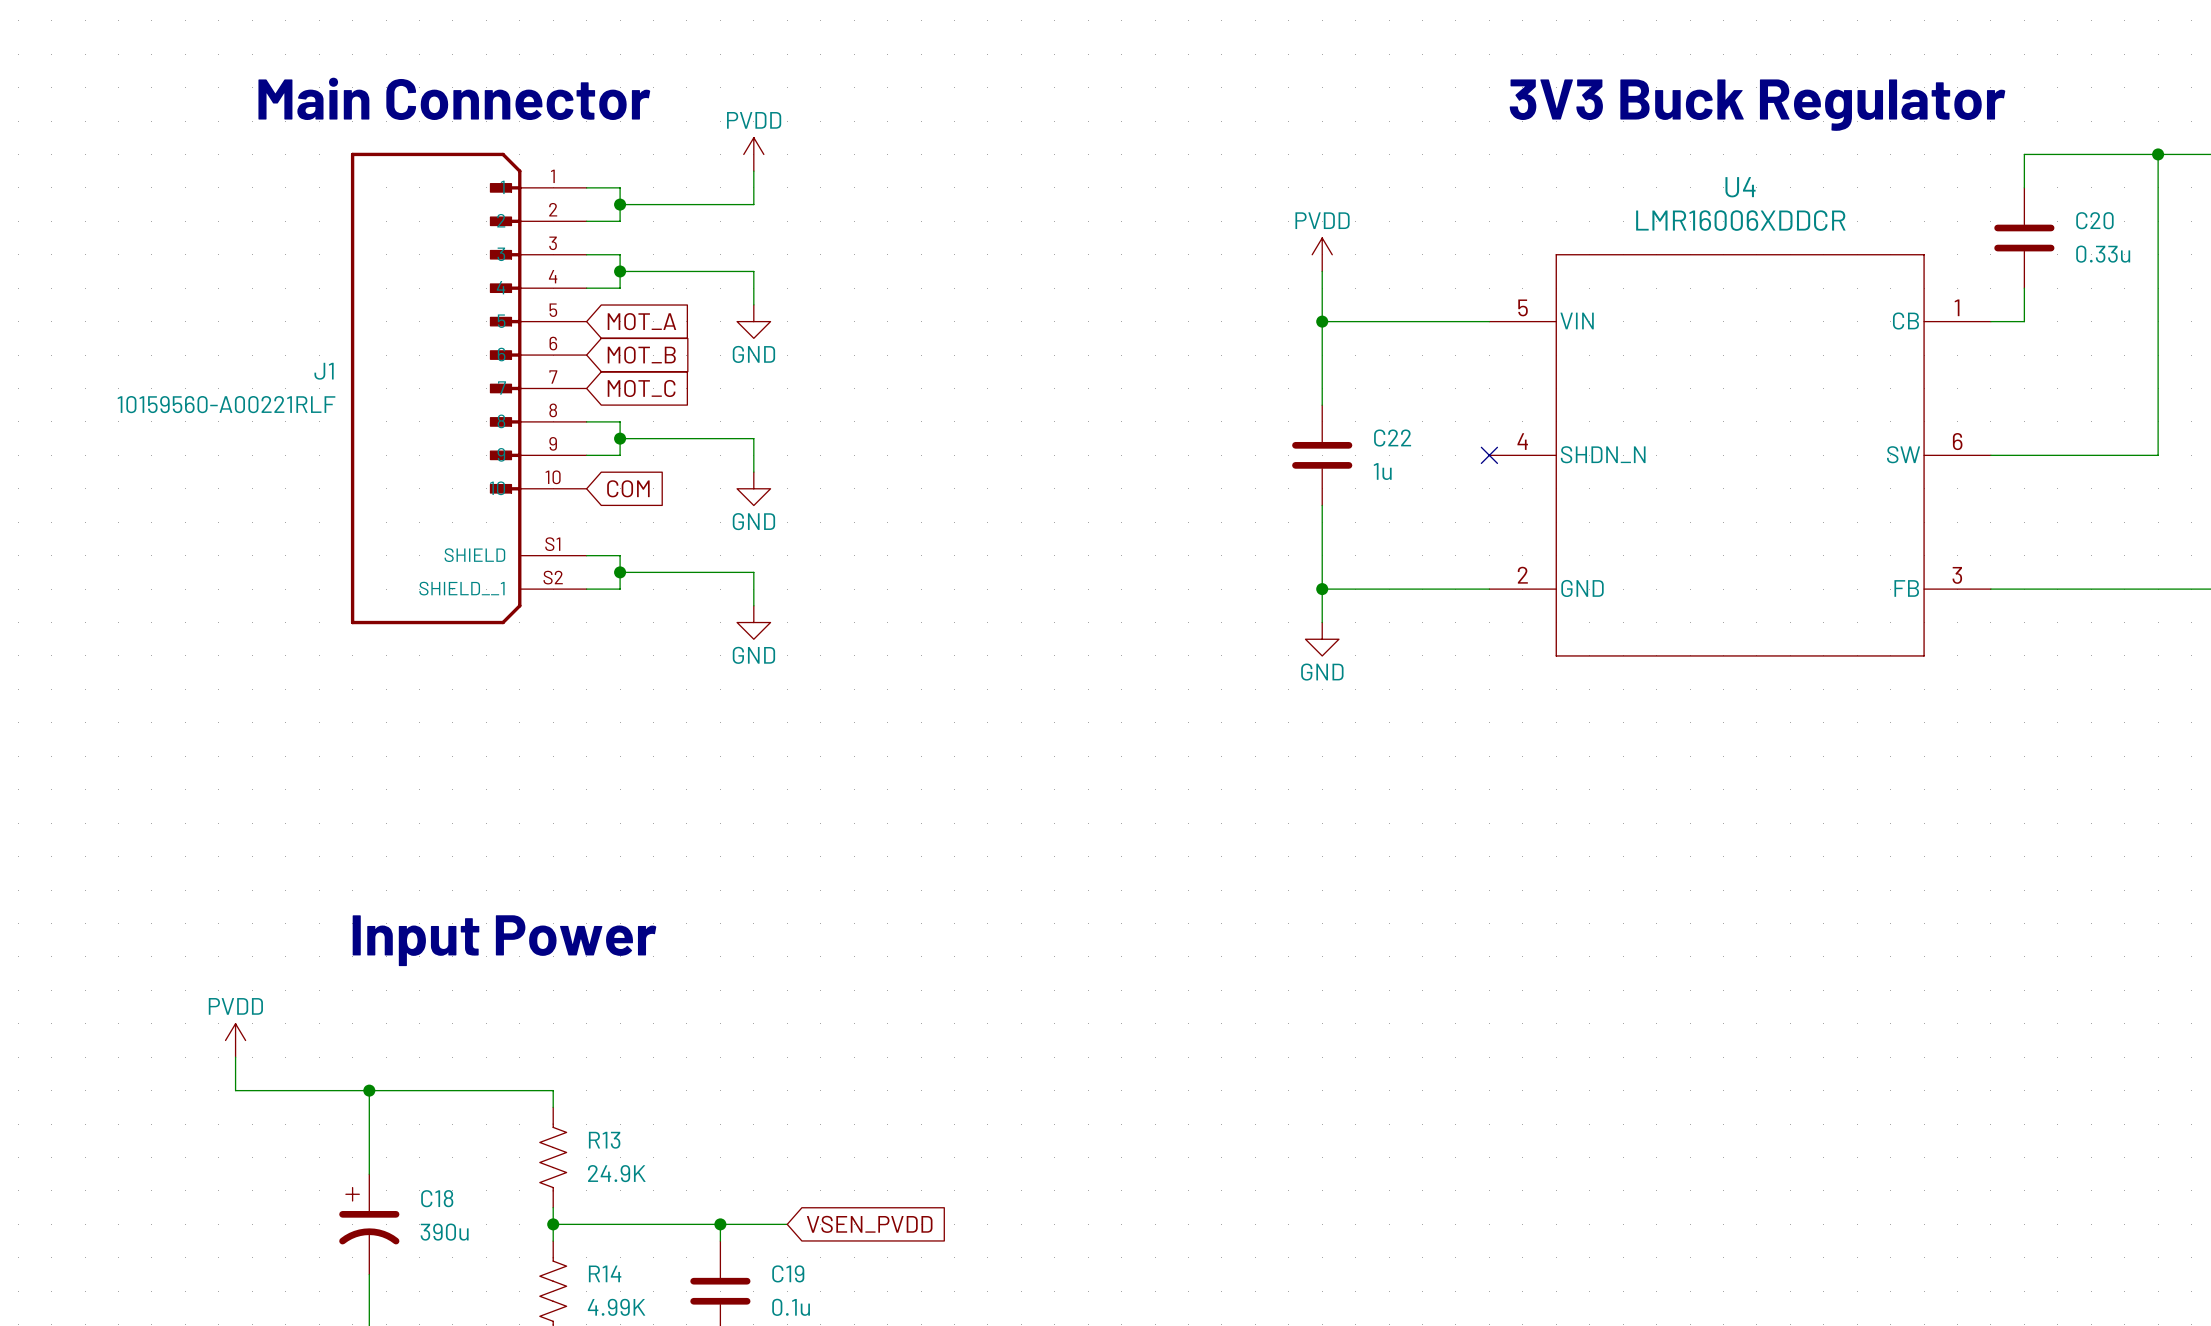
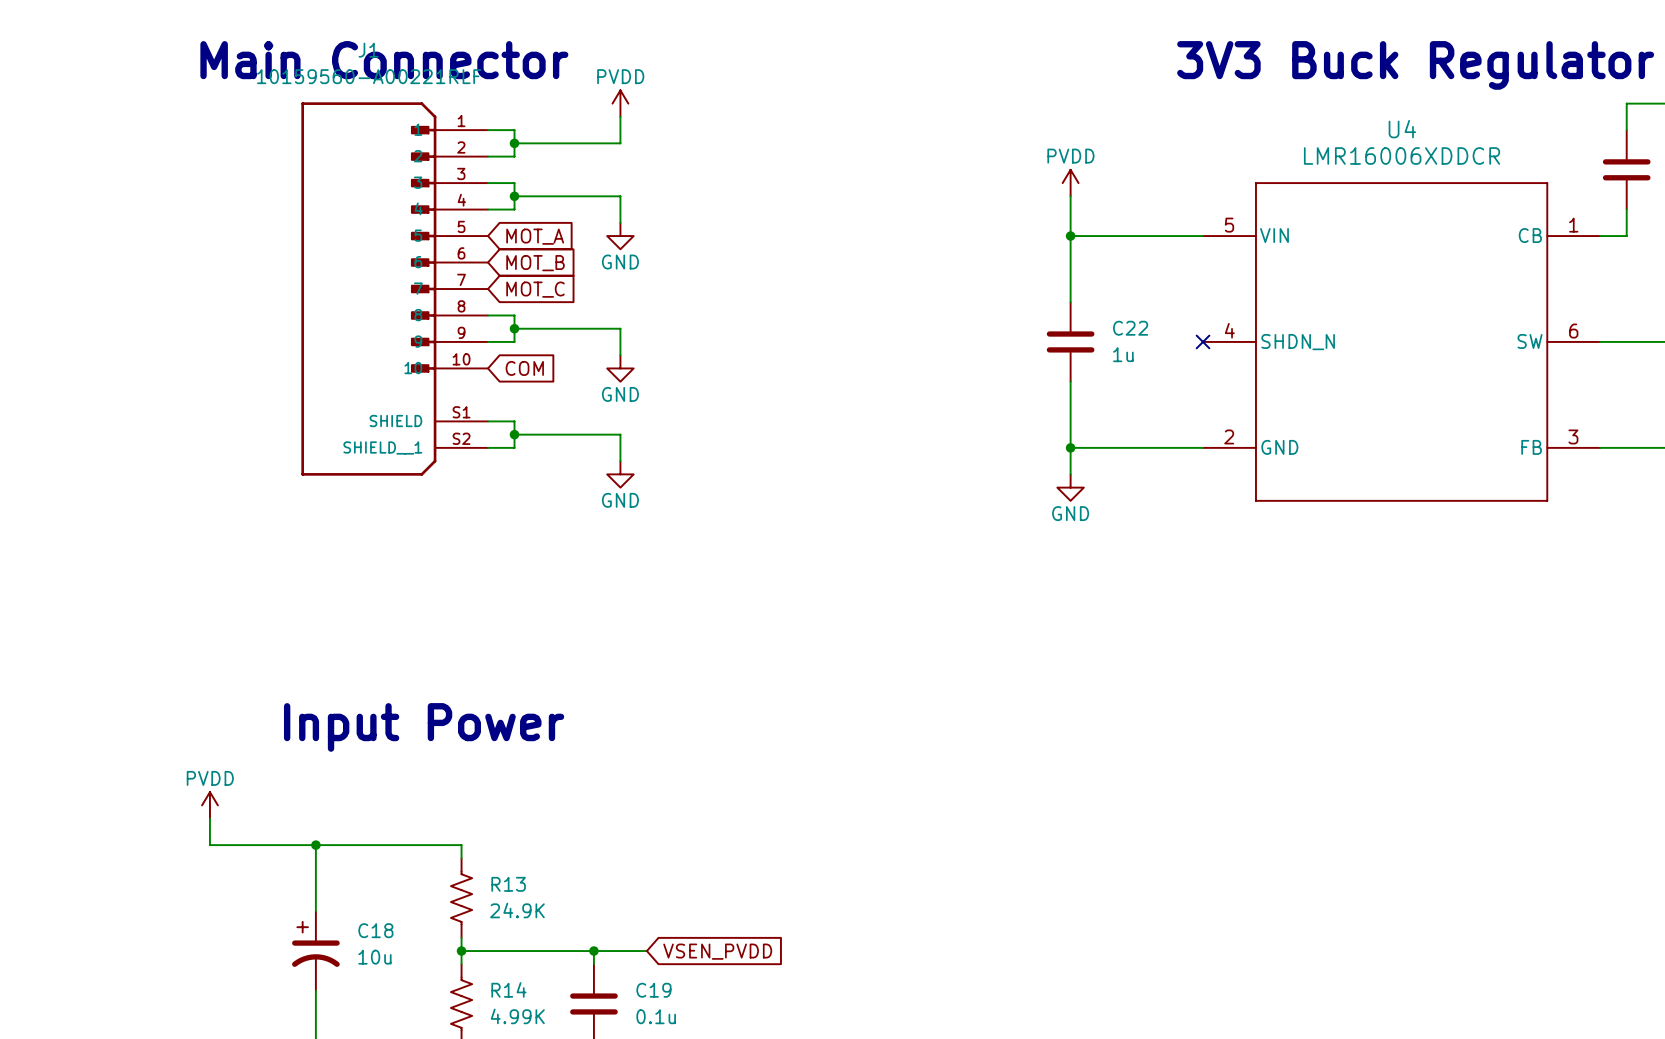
J1 name position: J1 (324, 371) -> J1 (368, 50)
J1 value position: 10159560-A00221RLF (226, 404) -> 10159560-A00221RLF (369, 76)
C18 value: 390u (444, 1232) -> 10u (374, 957)

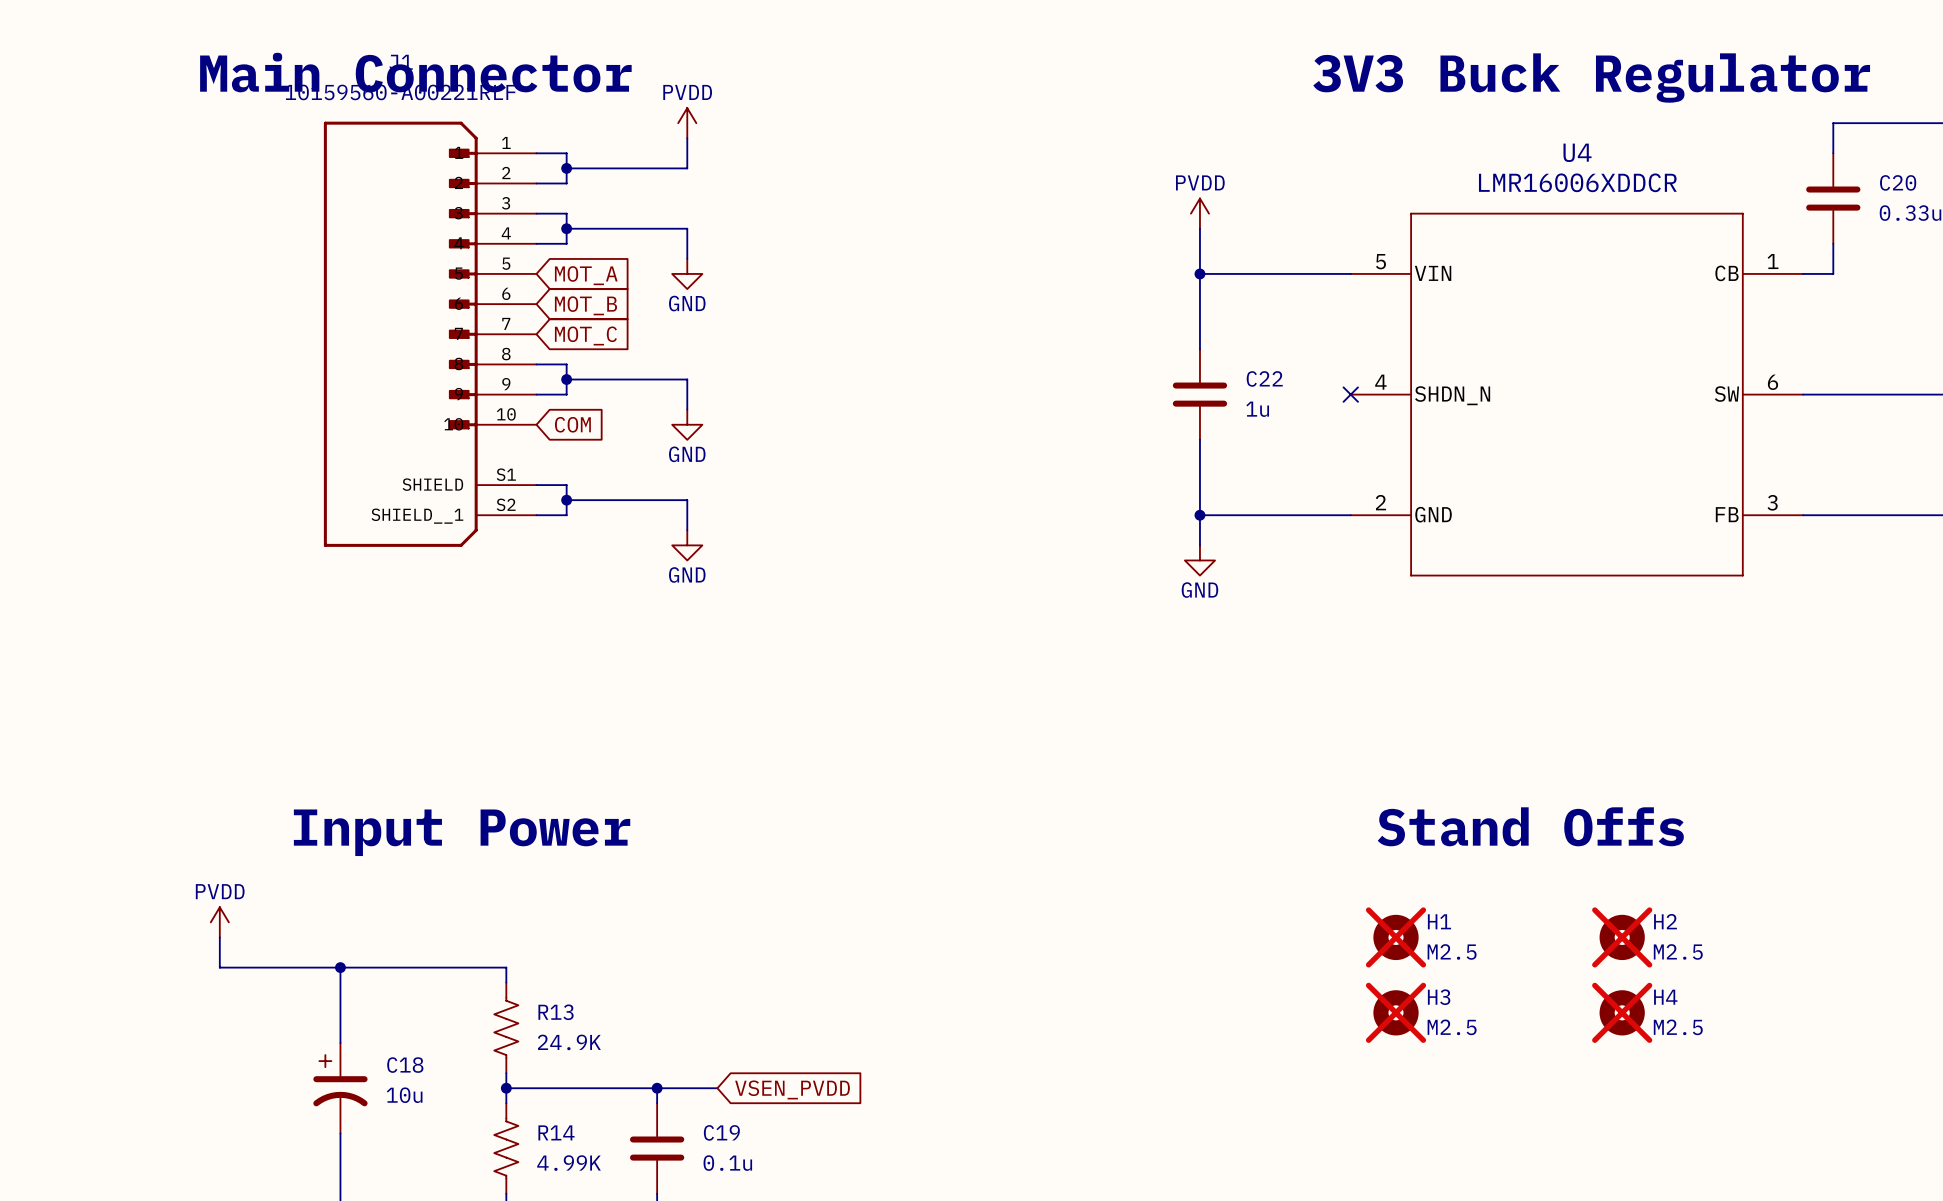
text: none -> Stand Offs (1530, 826)
H1: none -> M2.5 (1396, 937)
H2: none -> M2.5 (1622, 937)
H3: none -> M2.5 (1396, 1012)
H4: none -> M2.5 (1622, 1012)

